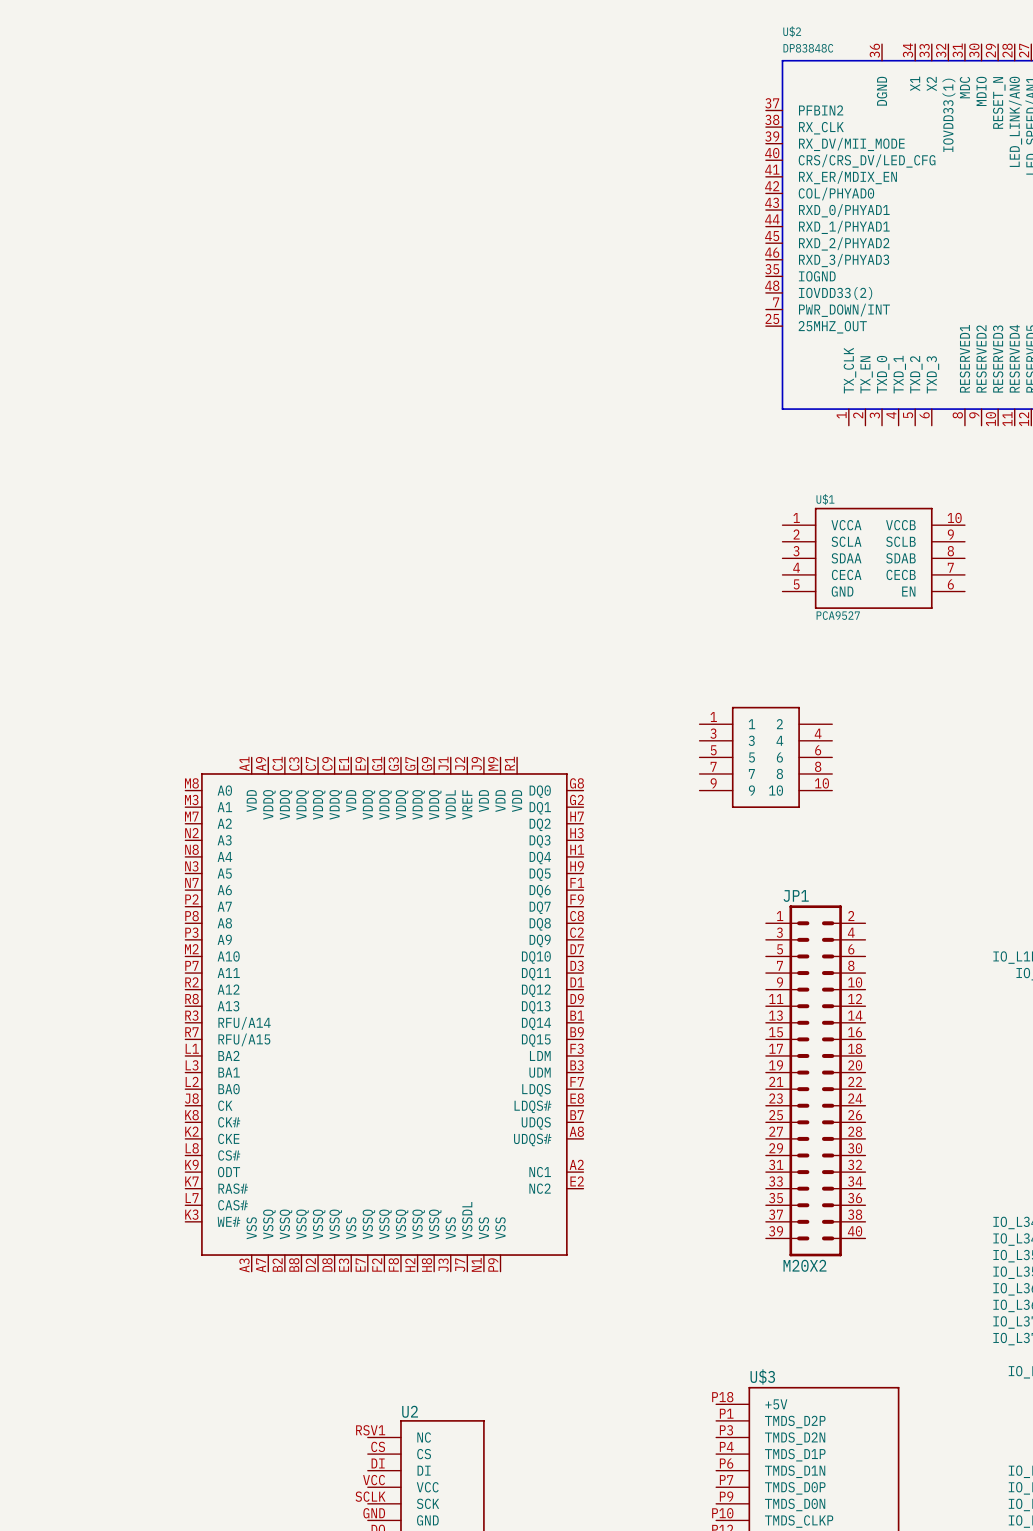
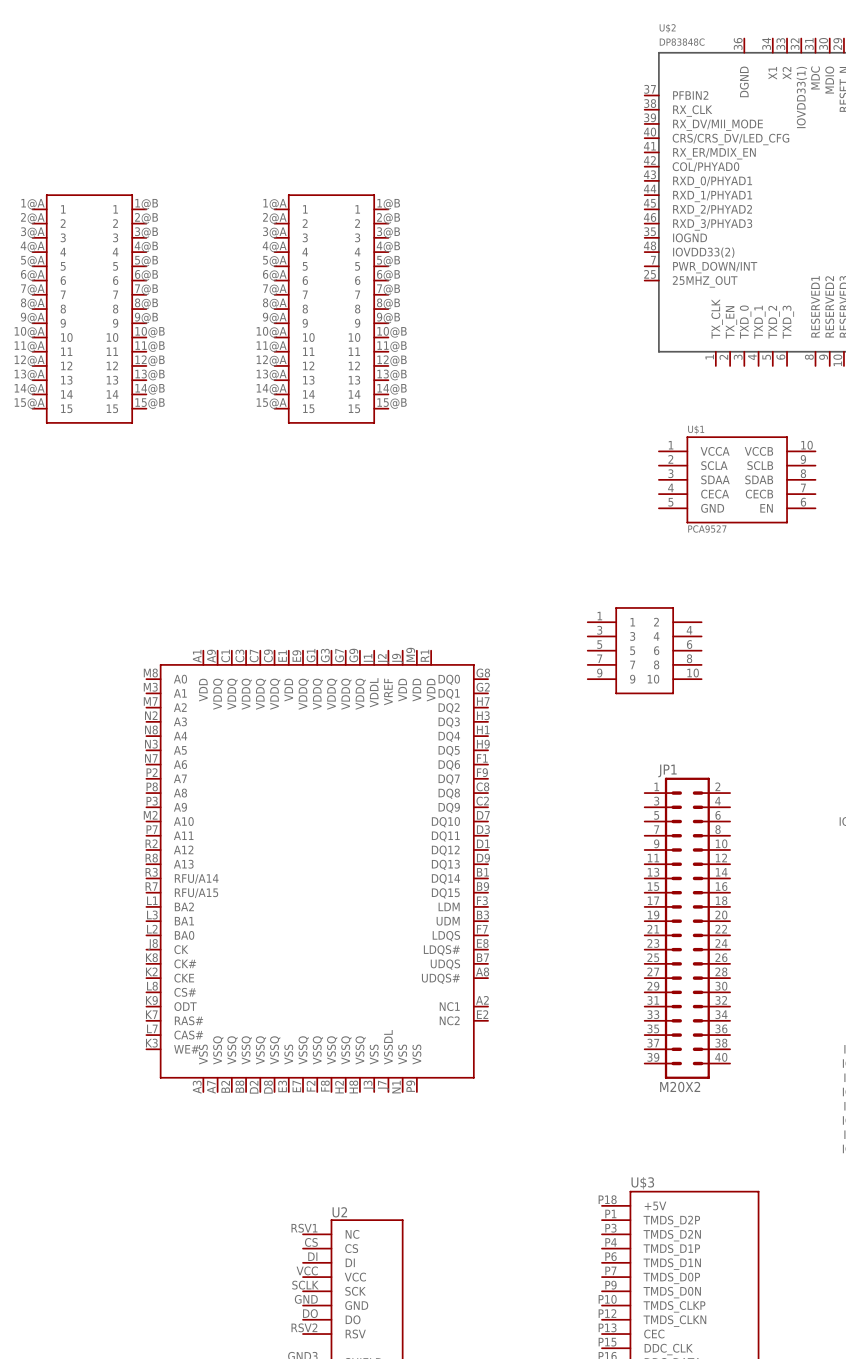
part: none -> (89, 309)
part: none -> (331, 309)

